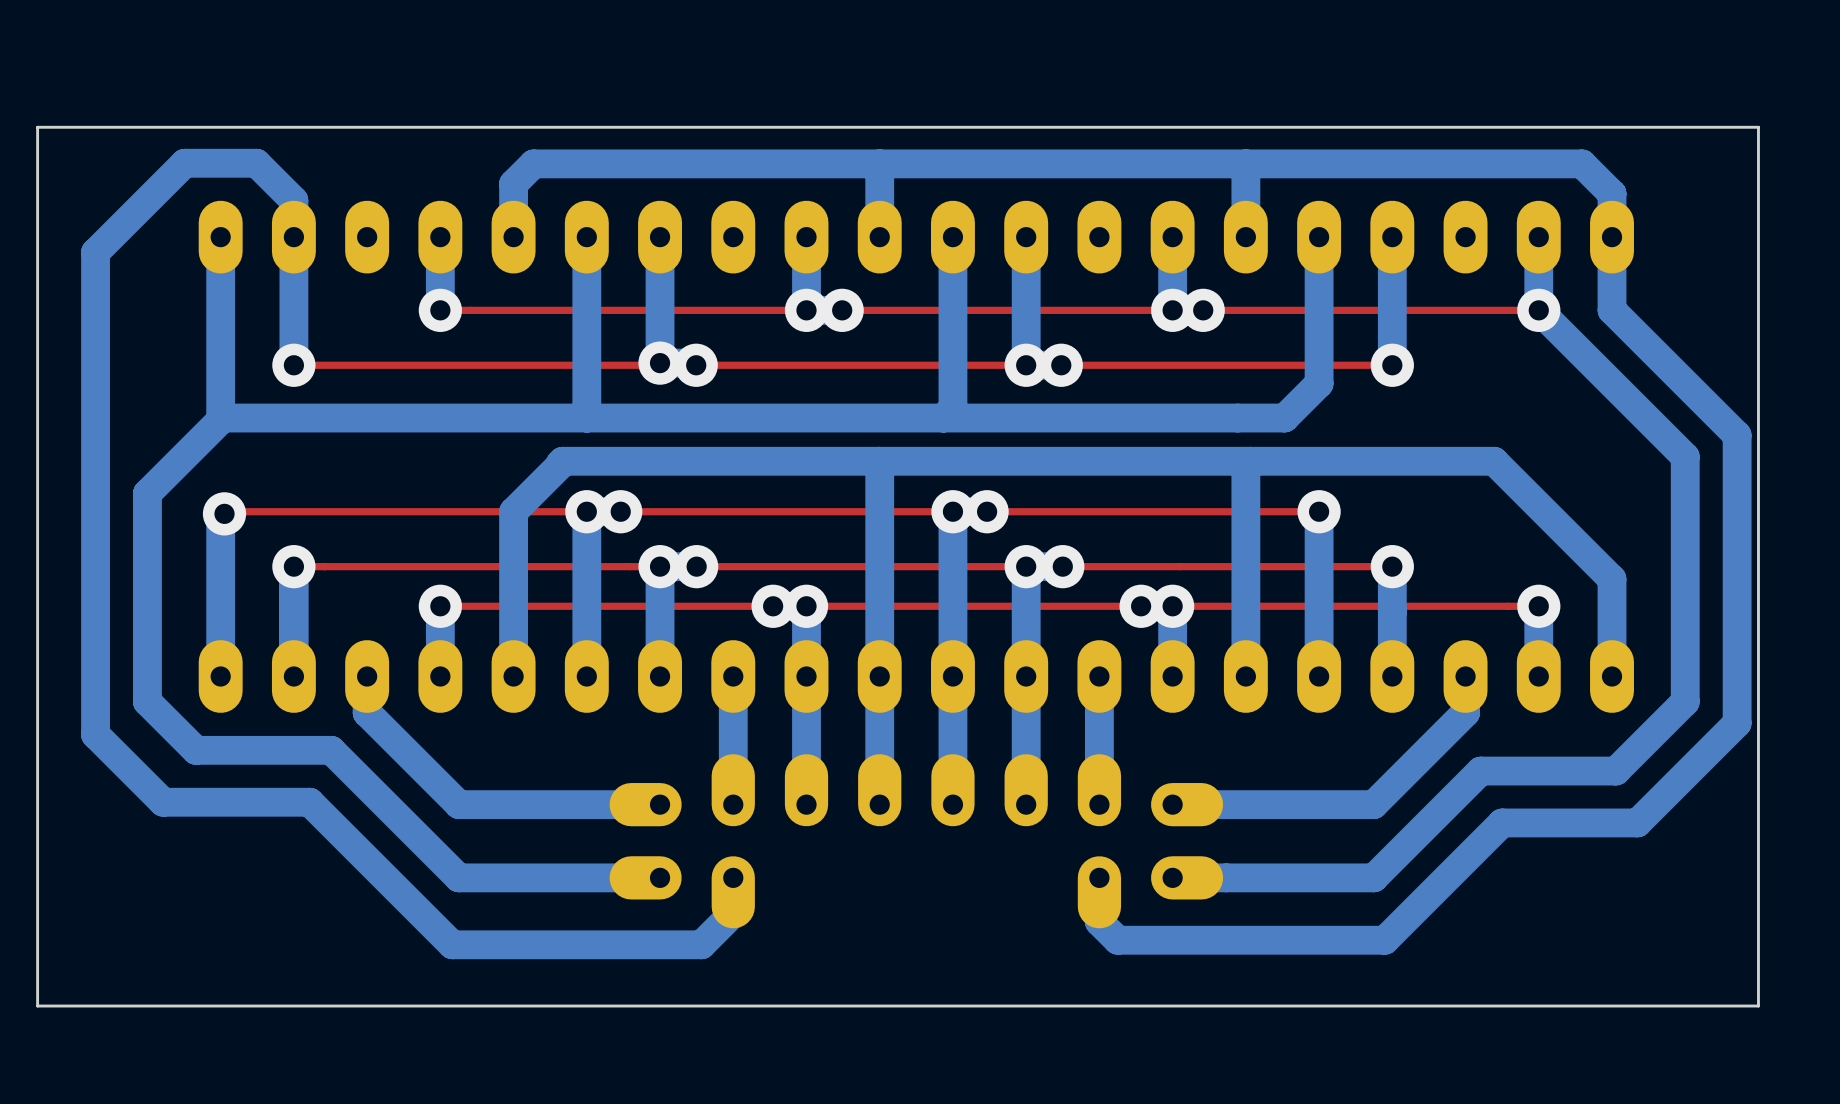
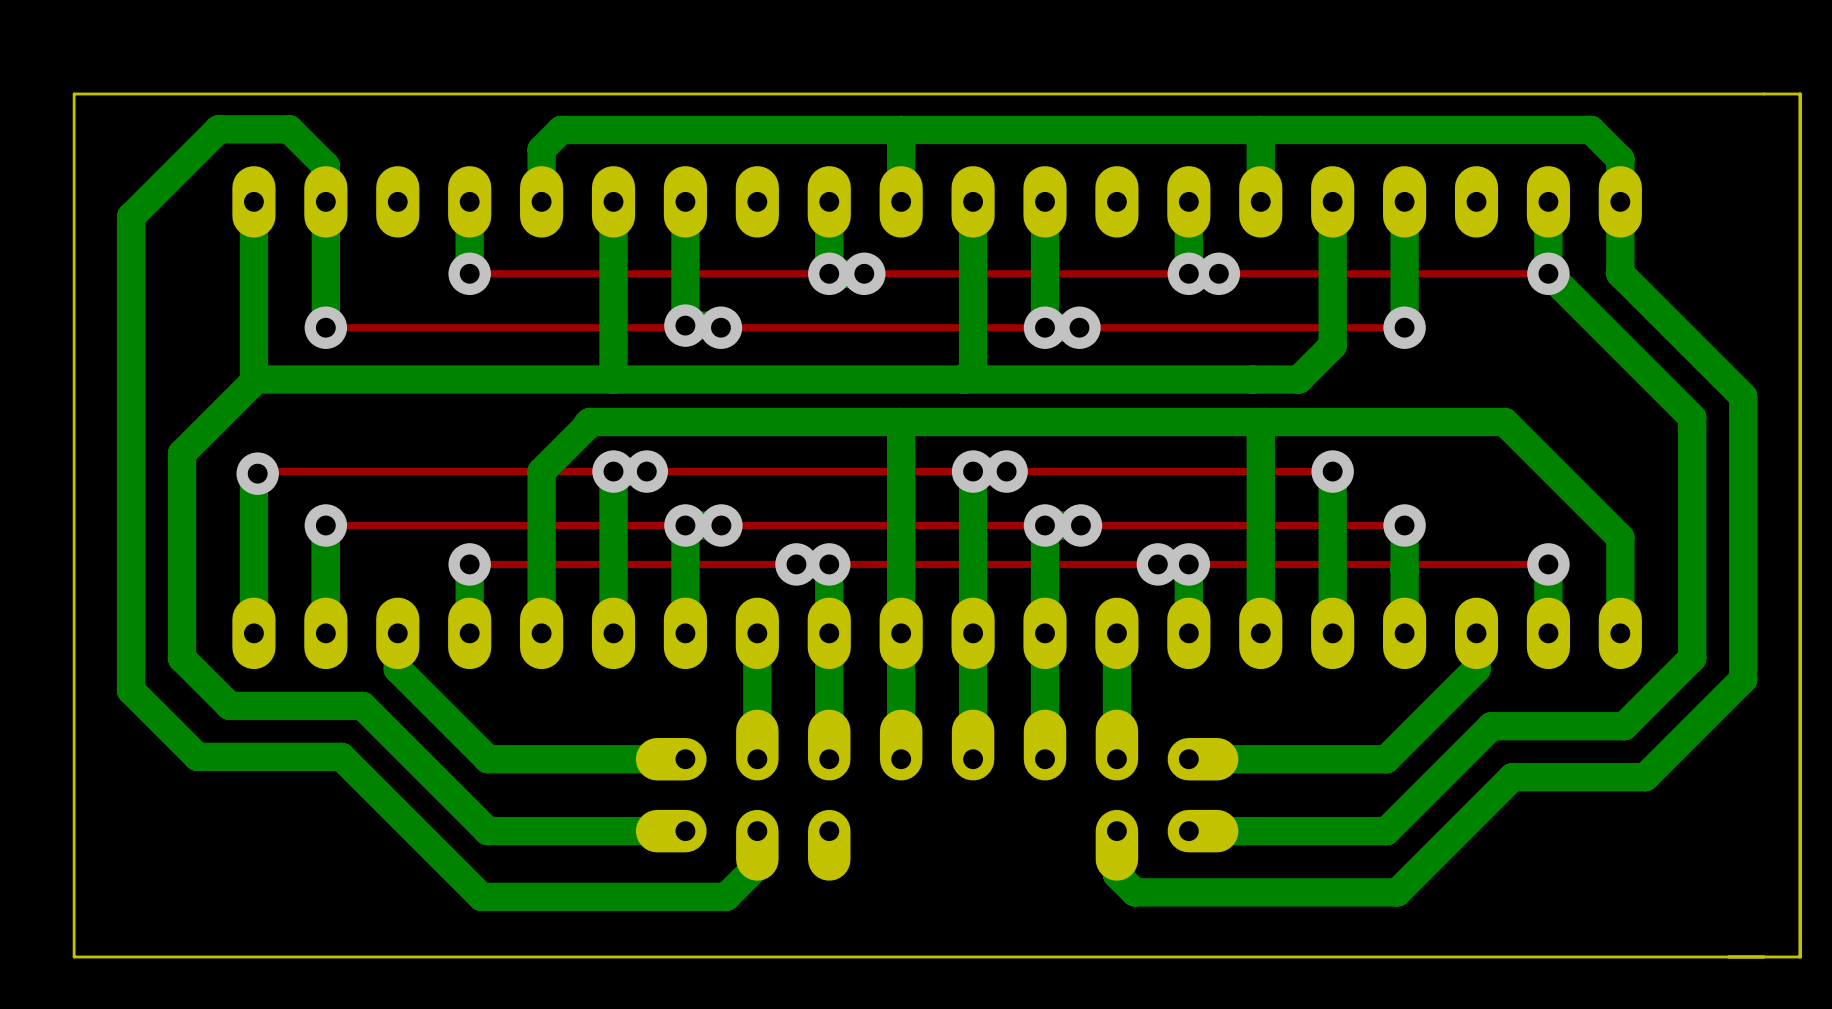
board edge: (1758, 127) (1758, 1006) -> (1764, 93) (1800, 93) (1800, 956) (1764, 956)
part footprint: [609, 754, 1224, 929] -> [635, 709, 1239, 881]

